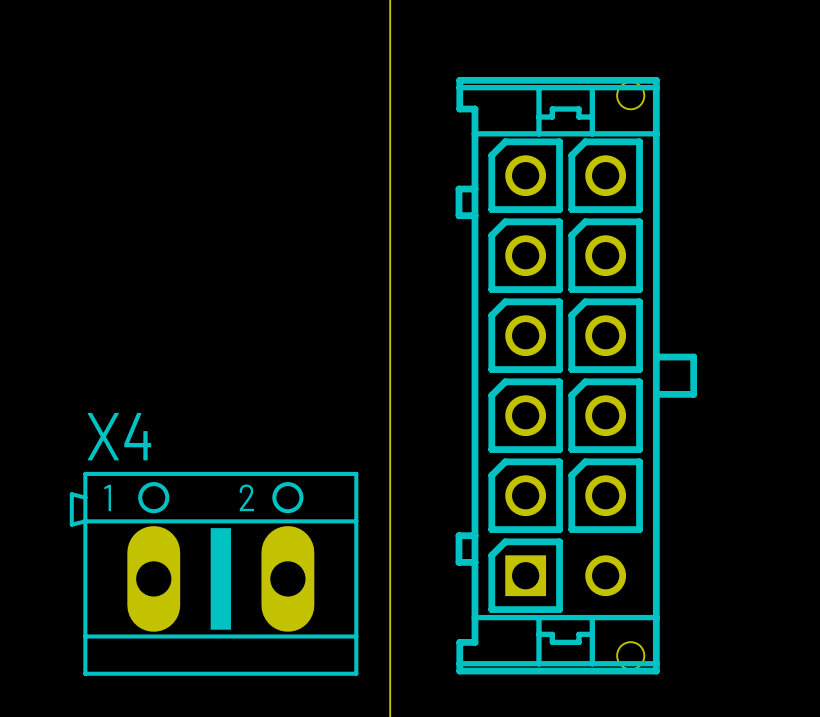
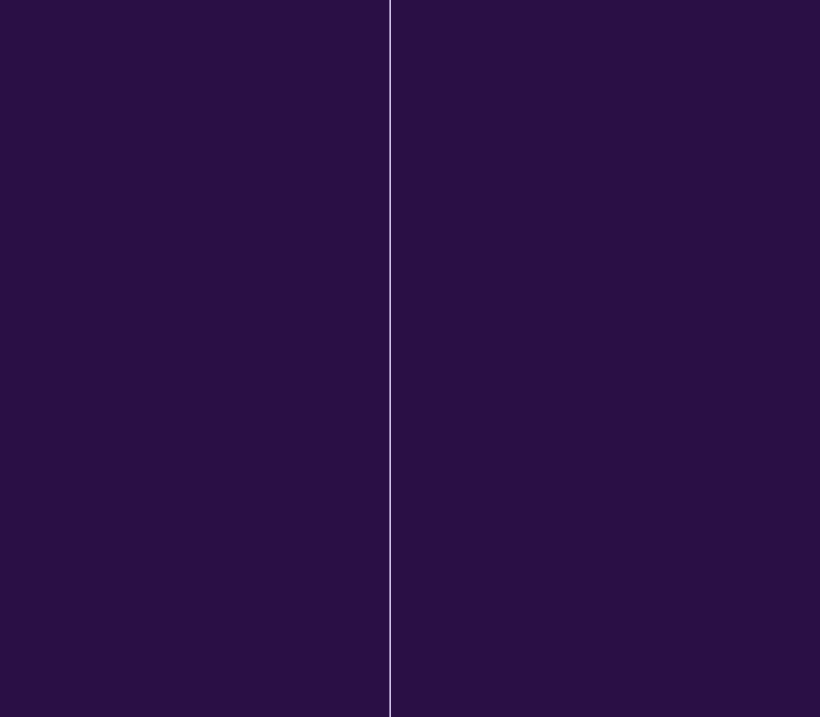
part: (576, 375) -> none
X4: (214, 573) -> none

